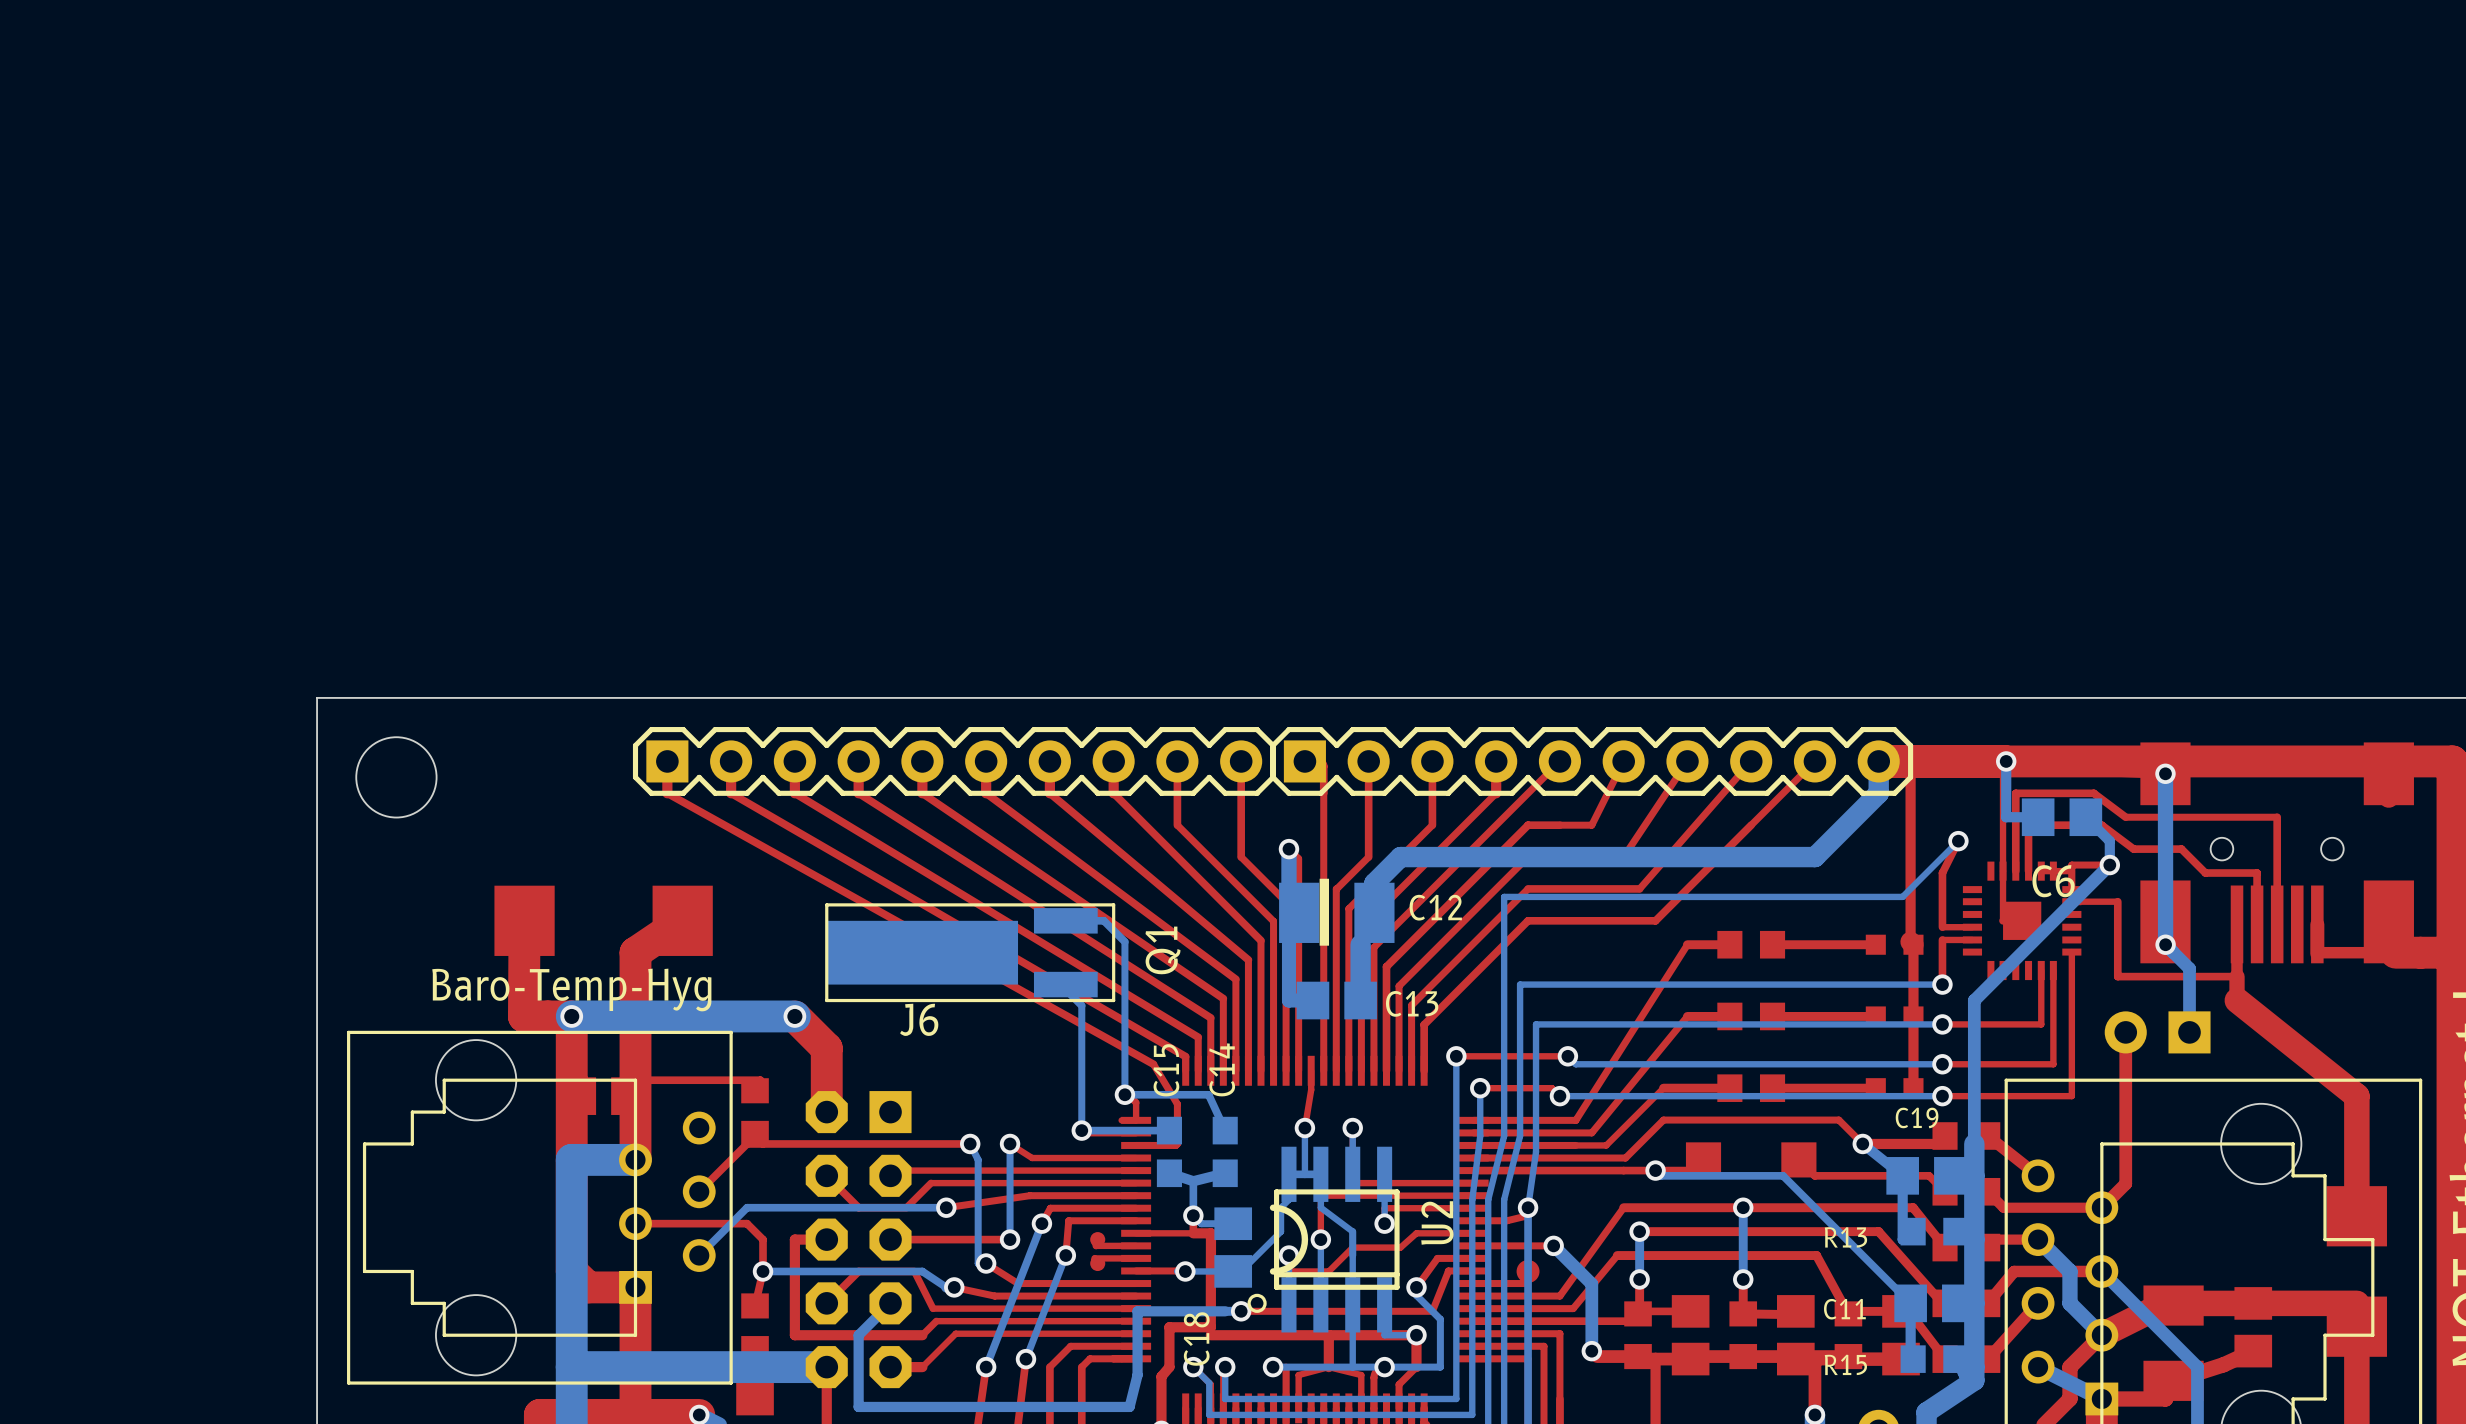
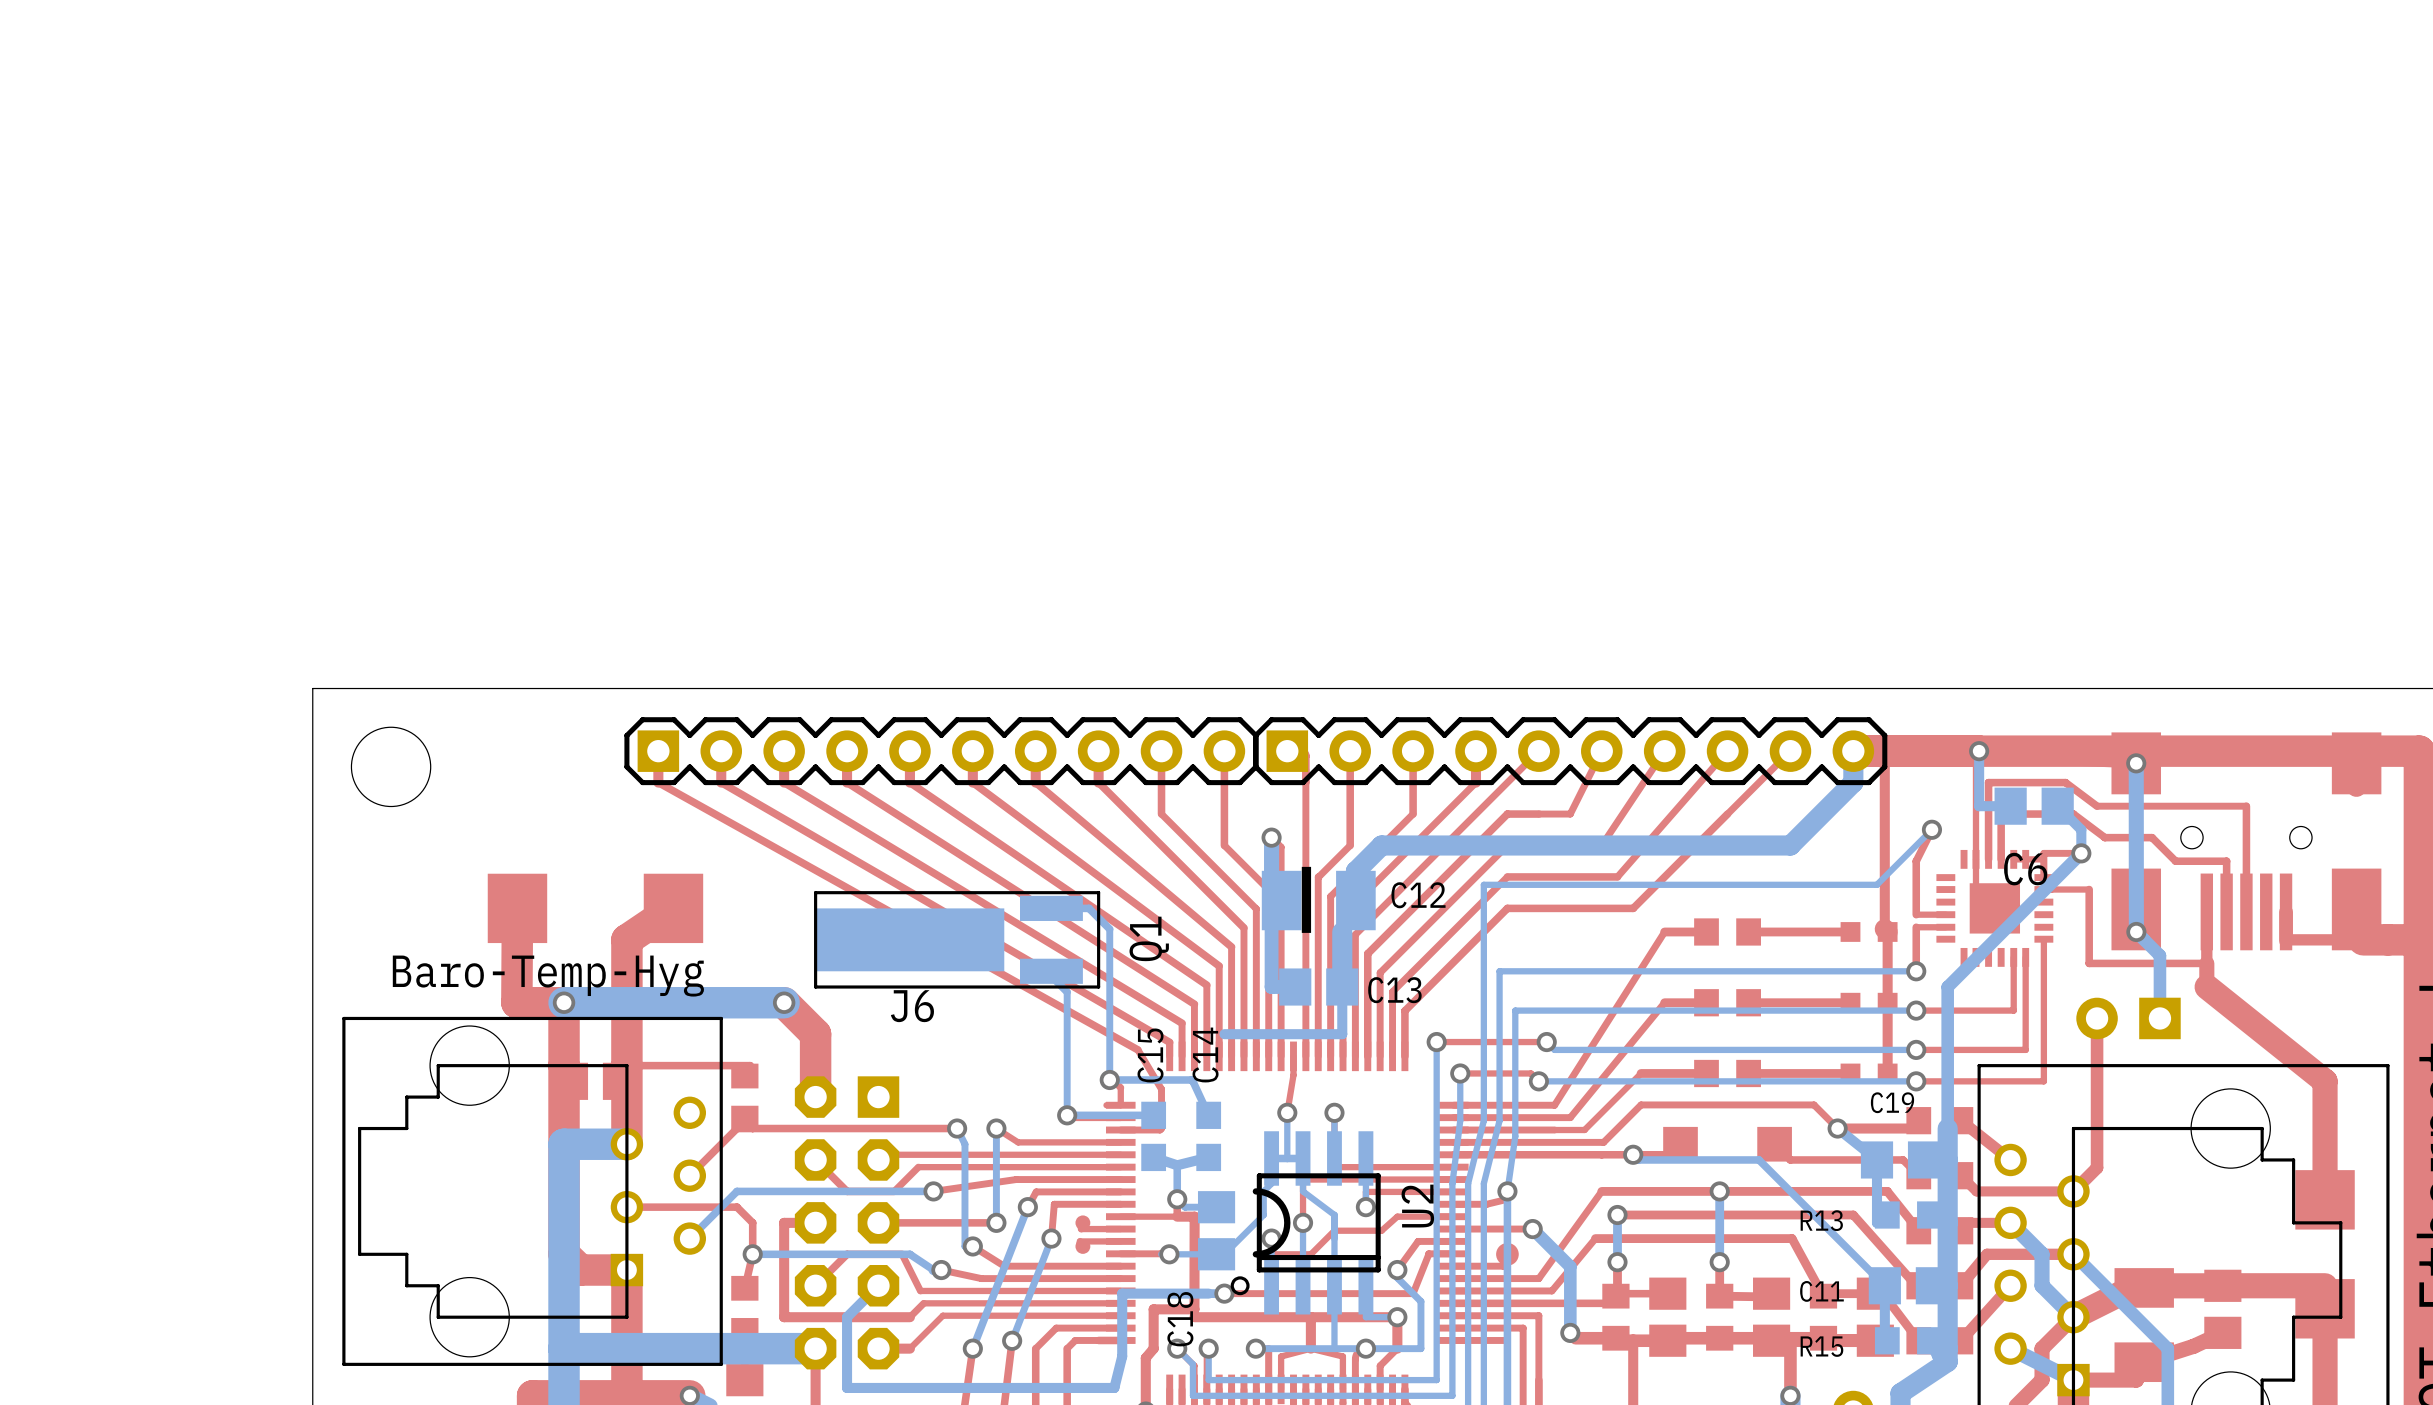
part footprint: [1962, 861, 2082, 981] -> [1936, 849, 2054, 967]
bottom track: none -> (1342, 987) (1342, 1034) (1224, 1034)

